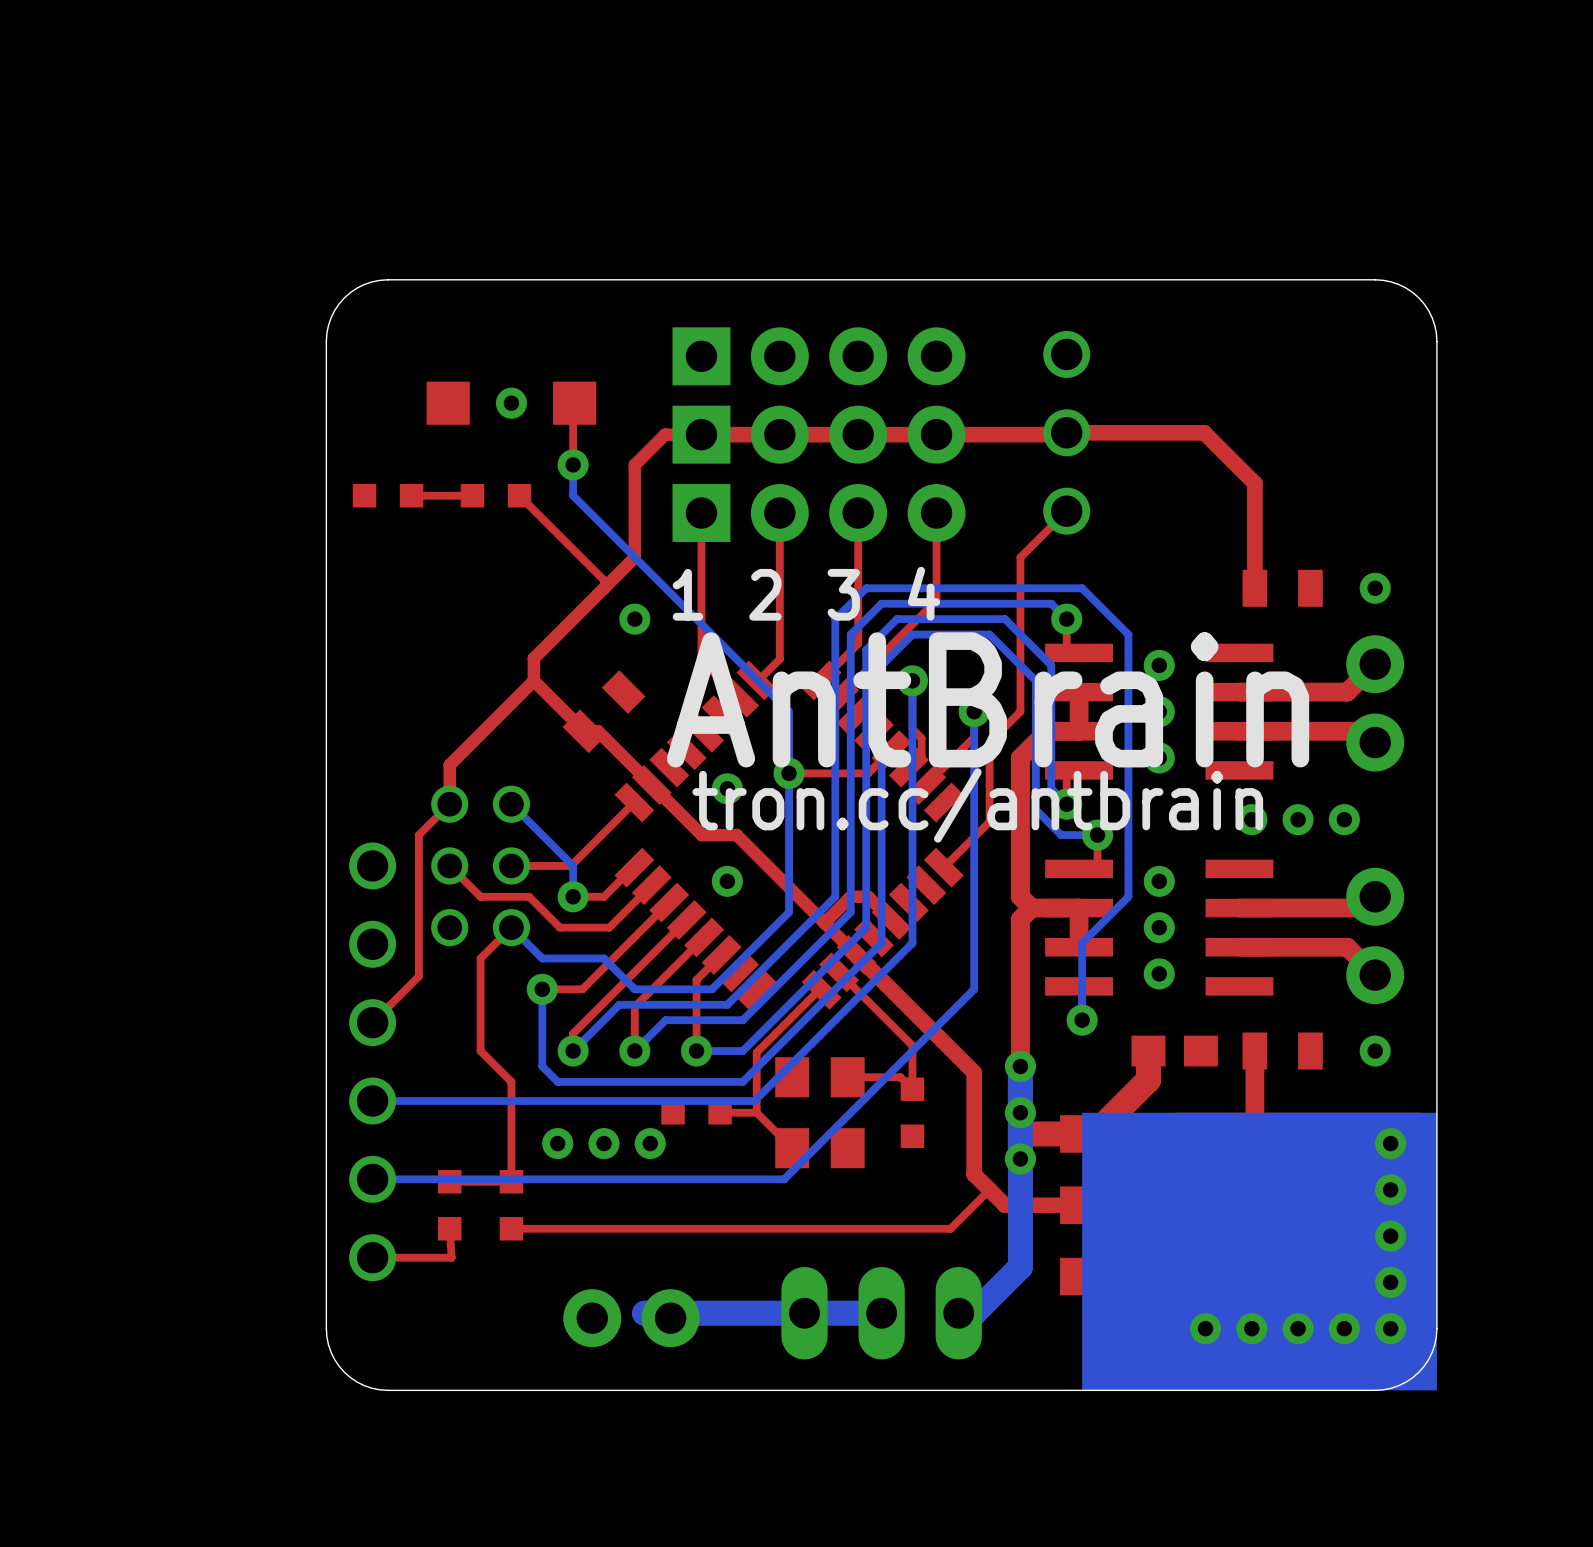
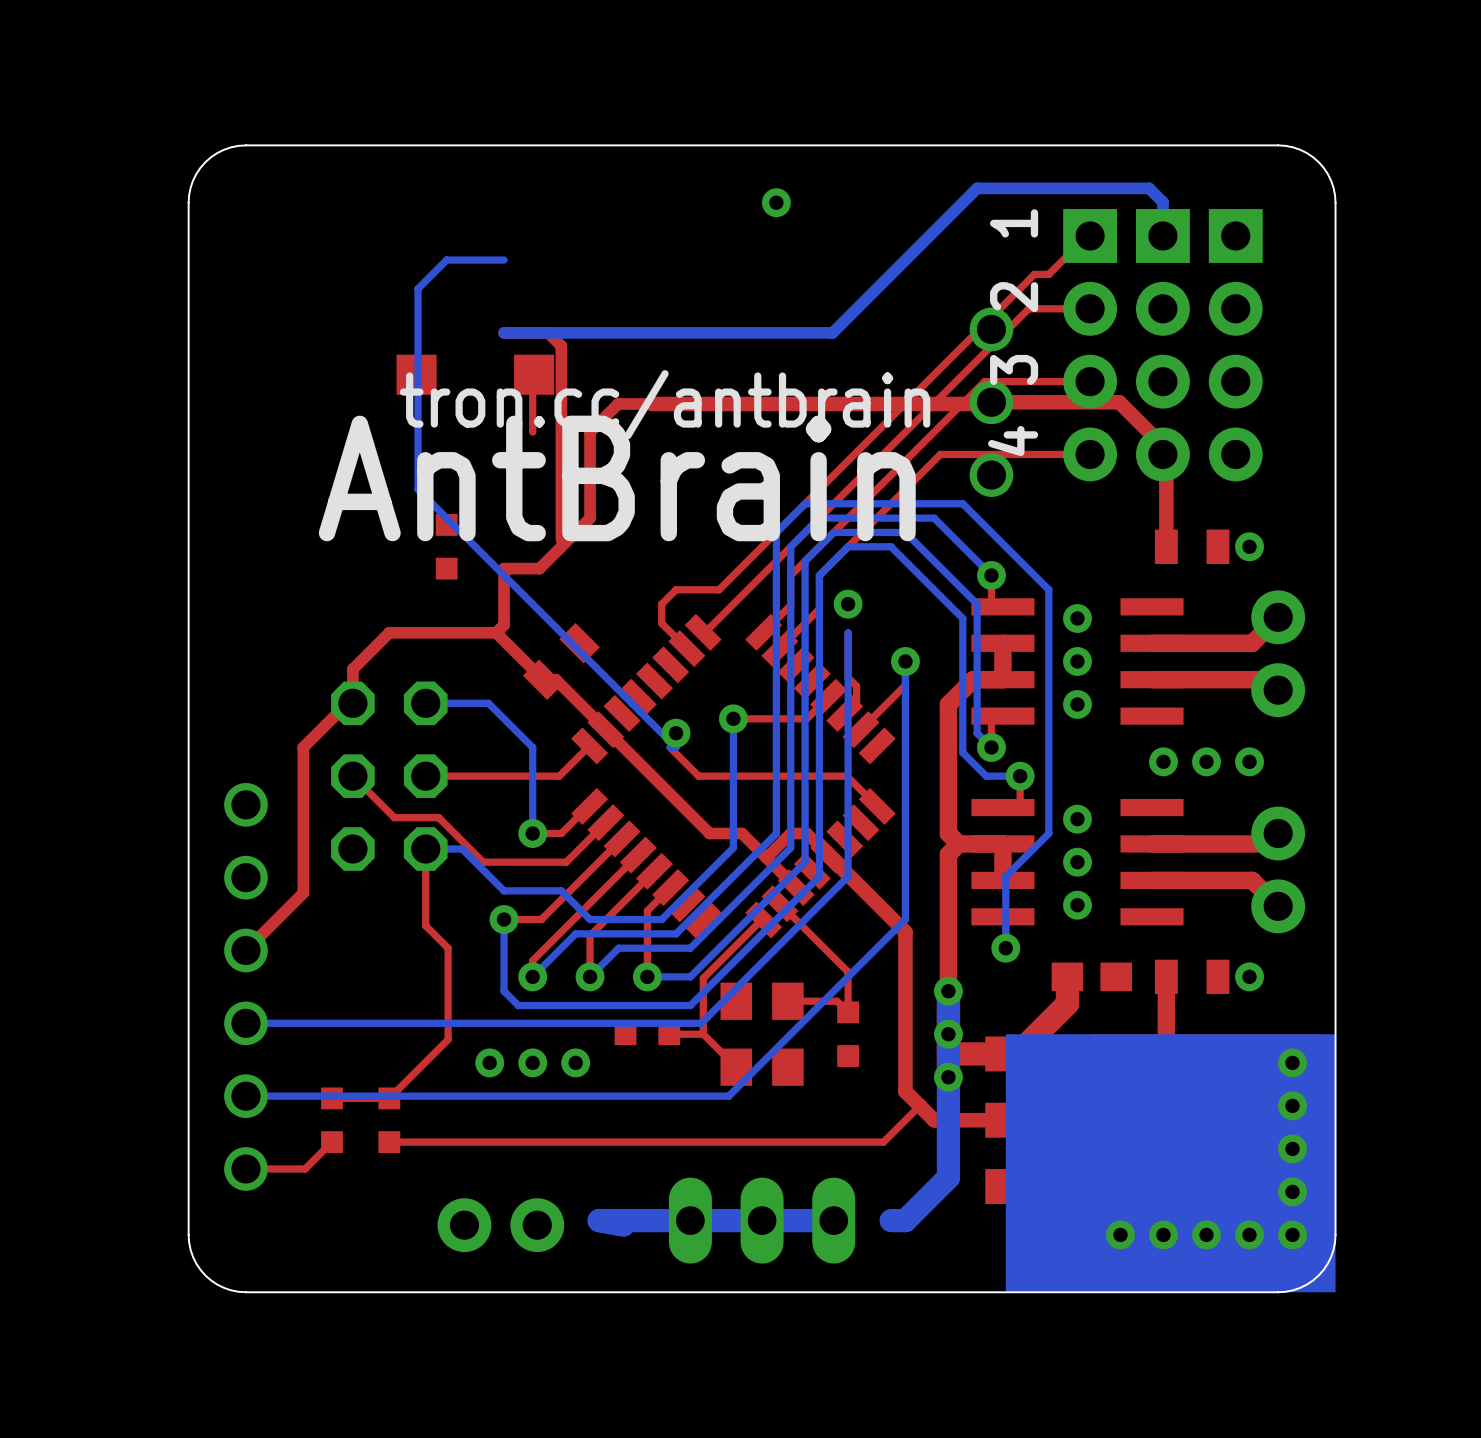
via: none -> (776, 202)
bottom track: none -> (1162, 235) (1162, 202) (1149, 188) (977, 188) (832, 332) (504, 332)
bottom track: none -> (504, 260) (446, 260) (418, 288) (418, 489) (676, 747) (670, 747)
board edge: (1436, 341) (1432, 317) (1418, 297) (1398, 284) (1375, 279) (388, 279) (364, 284) (344, 297) (331, 317) (326, 341) (326, 1328) (331, 1352) (344, 1372) (364, 1385) (388, 1390) -> (1335, 317) (1335, 202) (1333, 187) (1327, 174) (1318, 162) (1306, 153) (1285, 145) (245, 145) (224, 149) (205, 162) (193, 180) (188, 202) (189, 1242) (196, 1263) (205, 1275) (217, 1284) (231, 1290) (245, 1292) (360, 1292)
part: (819, 356) -> none
part: none -> (1090, 345)
part: none -> (1162, 345)
part: none -> (1235, 345)
via: (511, 403) -> none
part: (819, 434) -> none
bottom track: (573, 464) (573, 495) (789, 711) (789, 773) -> none
via: (573, 464) -> none
part: (388, 495) -> none
top track: (472, 495) (411, 495) -> none
part: (496, 495) -> none
top track: (519, 495) (603, 580) -> (504, 332) (548, 332) (561, 346) (561, 539)
top track: (1066, 511) (1020, 557) (1020, 711) (989, 742) (989, 821) (943, 867) -> (670, 747) (698, 776) (846, 776) (877, 806)
top track: (701, 513) (701, 660) (711, 670) -> (1090, 235) (1087, 235) (1048, 274) (1034, 274) (719, 589) (676, 589) (661, 604) (661, 623)
top track: (779, 513) (779, 659) -> (1090, 308) (1028, 308) (724, 612)
part: (819, 513) -> none
top track: (858, 513) (858, 643) (850, 651) -> (1090, 381) (984, 381) (790, 575) (790, 605)
top track: (936, 513) (936, 600) (881, 655) -> (1090, 454) (940, 454) (819, 575) (819, 609)
part: none -> (446, 546)
bottom track: (912, 588) (866, 588) (835, 619) -> (848, 546) (819, 575) (819, 618)
bottom track: (1082, 588) (958, 588) -> (962, 632) (962, 618) (891, 546)
bottom track: none -> (1005, 546) (962, 503) (805, 503) (776, 532) (776, 575)
via position: (1375, 588) -> (1249, 546)
text rotation: 0° (923, 593) -> 90° counterclockwise (1013, 441)
text position: 4 (923, 593) -> 4 (1013, 441)
text rotation: 0° (687, 594) -> 90° counterclockwise (1014, 223)
text position: 1 (687, 594) -> 1 (1014, 223)
text rotation: 0° (765, 594) -> 90° counterclockwise (1014, 297)
text position: 2 (765, 594) -> 2 (1014, 297)
text rotation: 0° (843, 594) -> 90° counterclockwise (1014, 369)
text position: 3 (843, 594) -> 3 (1014, 369)
bottom track: (1051, 603) (881, 603) (850, 634) -> (977, 561) (934, 518) (819, 518) (790, 546) (790, 589)
top track: (580, 611) (533, 658) (533, 680) (449, 764) (449, 804) (418, 835) (418, 976) (372, 1022) -> (539, 568) (504, 568) (504, 624) (496, 632) (389, 632) (352, 669) (352, 703) (347, 703) (303, 747) (303, 893) (245, 950)
via: (634, 619) -> none
bottom track: (866, 649) (897, 619) (1005, 619) (1051, 665) -> (805, 604) (805, 561) (833, 532) (905, 532) (977, 604) (977, 618)
bottom track: (881, 665) (912, 634) (989, 634) (1035, 680) -> none
via position: (912, 680) -> (848, 604)
text position: AntBrain (988, 699) -> AntBrain (617, 478)
bottom track: (511, 804) (573, 865) -> (425, 703) (488, 703) (532, 747) (532, 804)
text position: tron.cc/antbrain (977, 805) -> tron.cc/antbrain (665, 404)
part: none -> (389, 776)
top track: (601, 835) (570, 865) (511, 865) -> (559, 776) (425, 776)
top track: (701, 835) (736, 835) (798, 896) -> (652, 776) (709, 833) (742, 833)
top track: (449, 865) (480, 896) (529, 896) (560, 927) -> (352, 776) (394, 817) (438, 817) (483, 862) (520, 862)
part: (480, 865) -> none
via: (727, 881) -> none
top track: none -> (425, 848) (425, 925) (448, 948) (448, 1039) (389, 1098) (332, 1098)
bottom track: none -> (425, 848) (462, 848) (475, 862)
top track: (511, 927) (480, 958) (480, 1051) (511, 1081) (511, 1181) (449, 1181) -> none
top track: (856, 954) (974, 1072) -> (828, 855) (905, 931) (905, 996)
via position: (1375, 1051) -> (1249, 976)
part position: (372, 1061) -> (245, 986)
bottom track: none -> (346, 1023) (245, 1023)
via: none -> (489, 1062)
via: (557, 1143) -> none
via: none -> (532, 1062)
via: (603, 1143) -> none
via: none -> (575, 1062)
via: (650, 1143) -> none
bottom track: none -> (346, 1096) (245, 1096)
part position: (449, 1205) -> (389, 1120)
part position: (511, 1205) -> (332, 1120)
top track: none -> (332, 1142) (305, 1168) (245, 1168)
top track: (449, 1228) (451, 1257) (372, 1257) -> none
top track: none -> (475, 1142) (389, 1142)
part position: (881, 1313) -> (762, 1220)
part position: (631, 1318) -> (500, 1225)

